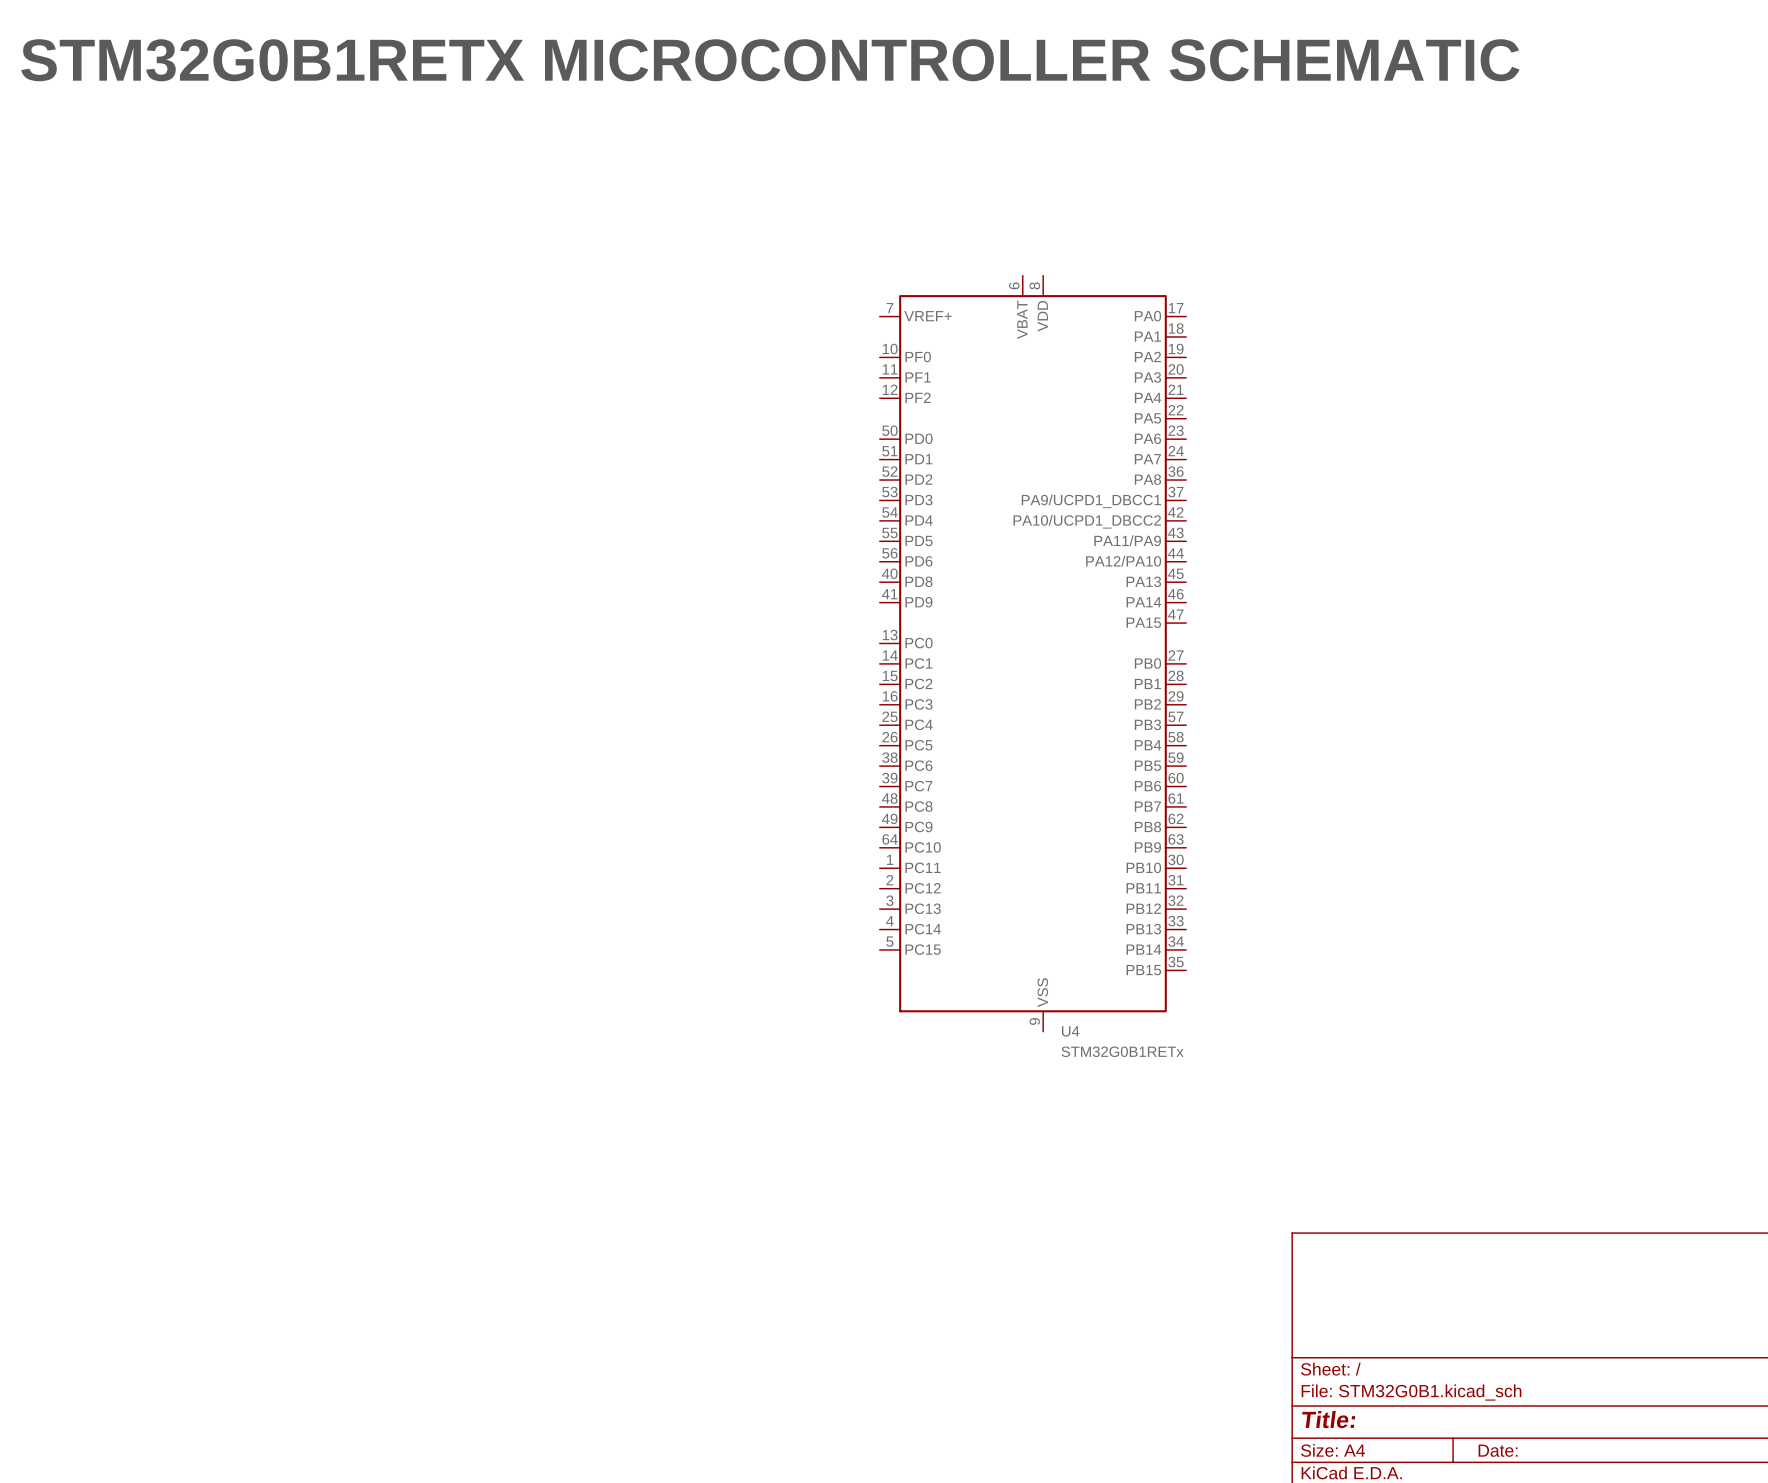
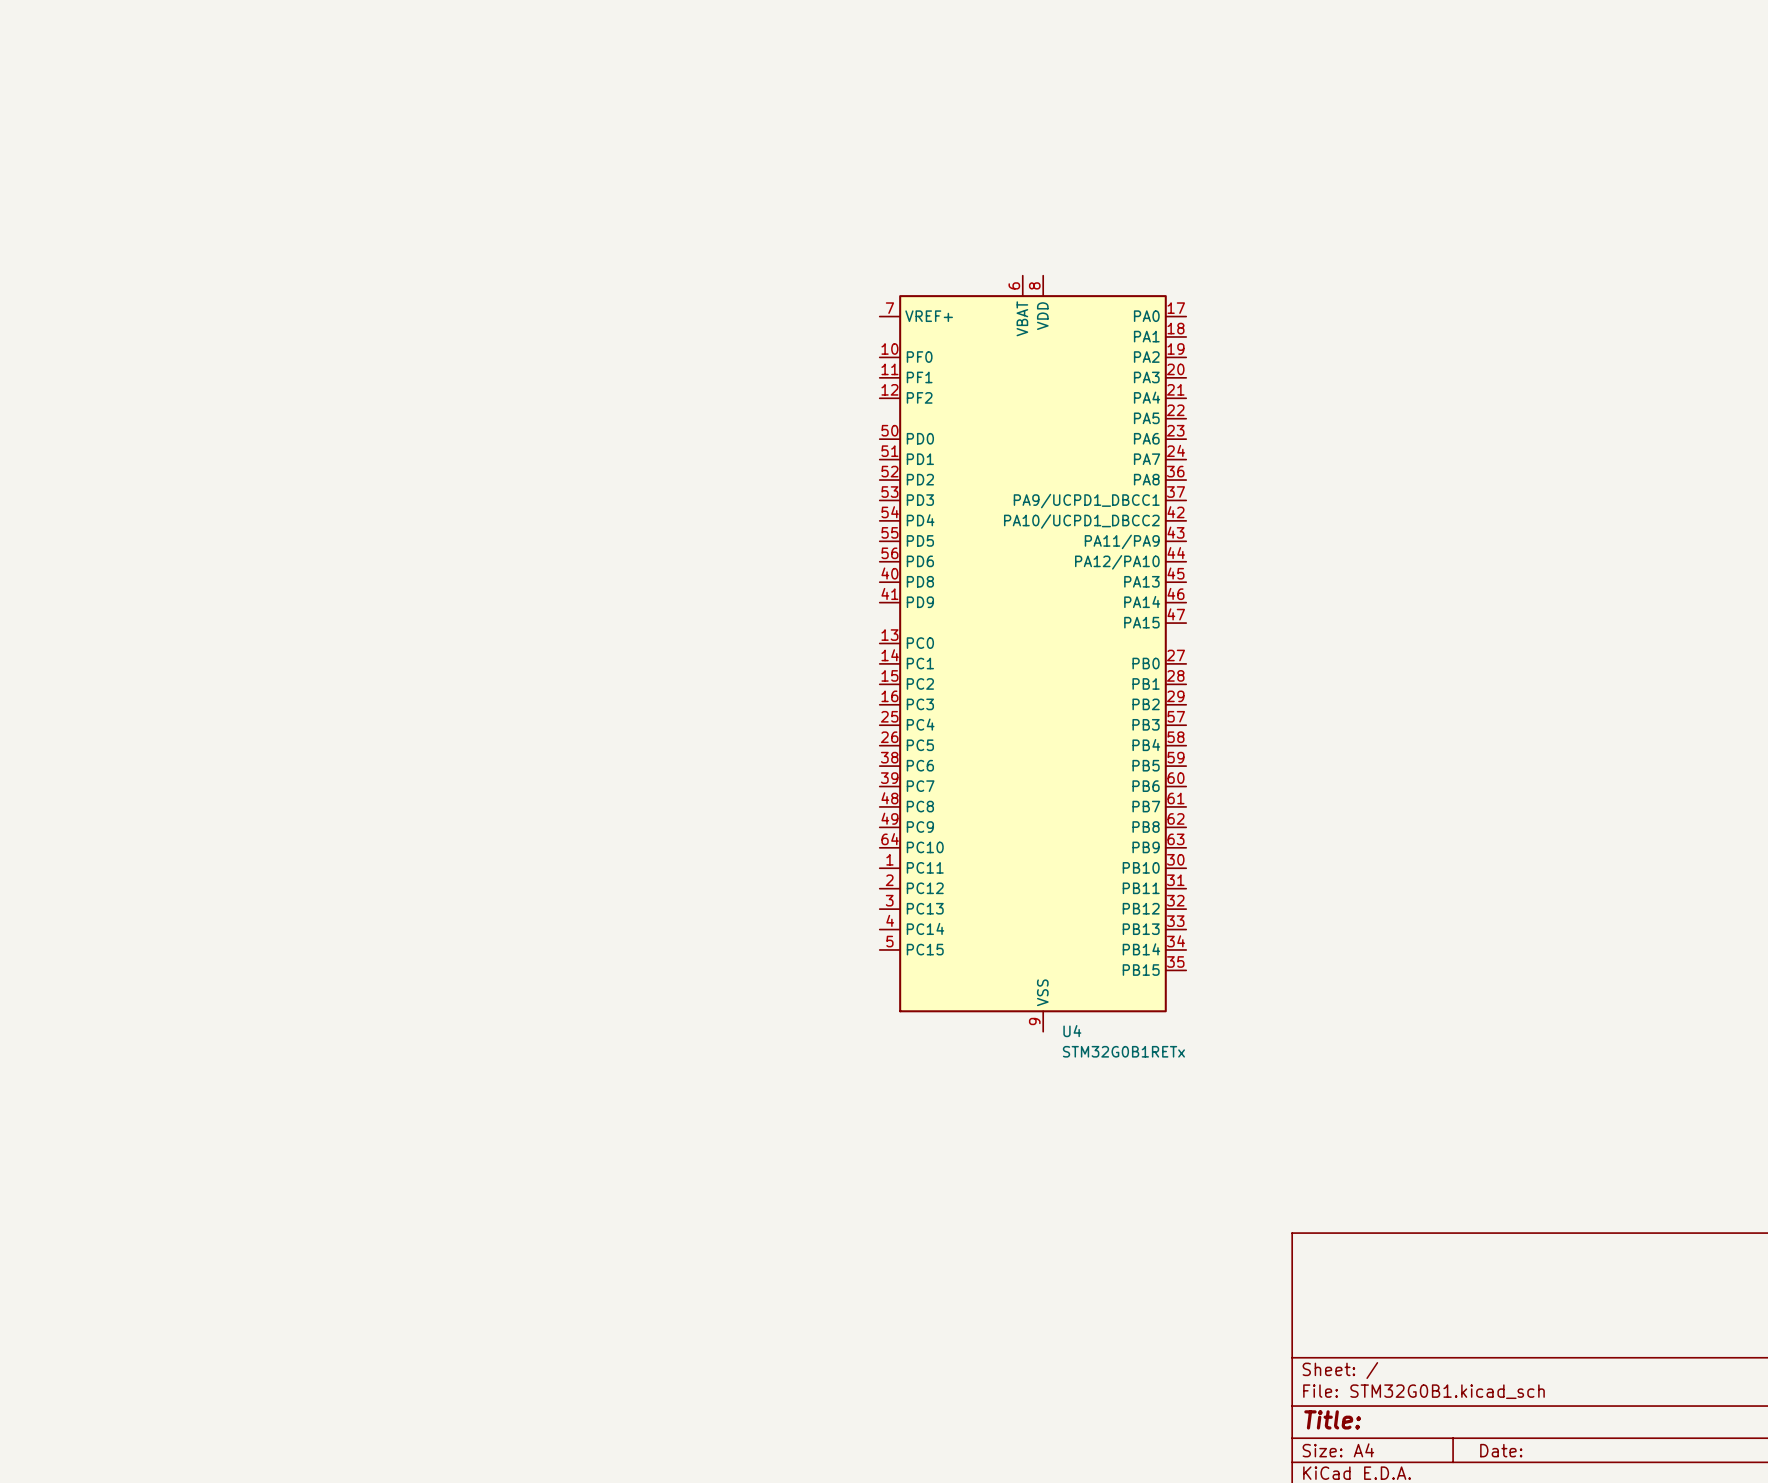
text: STM32G0B1RETX MICROCONTROLLER SCHEMATIC (770, 60) -> none

